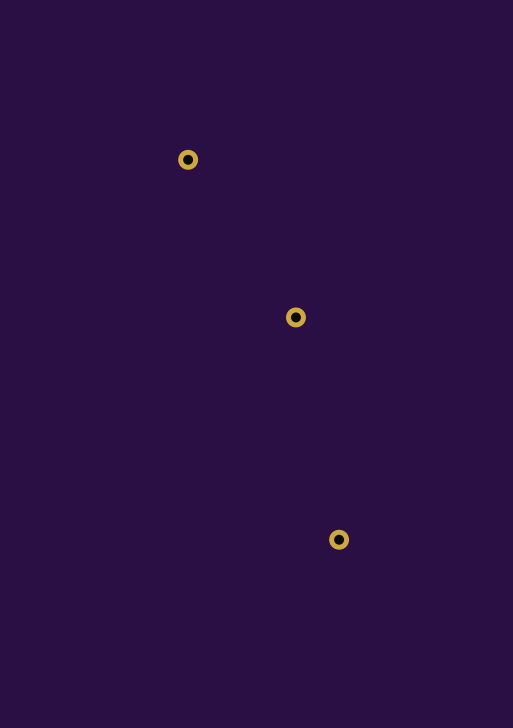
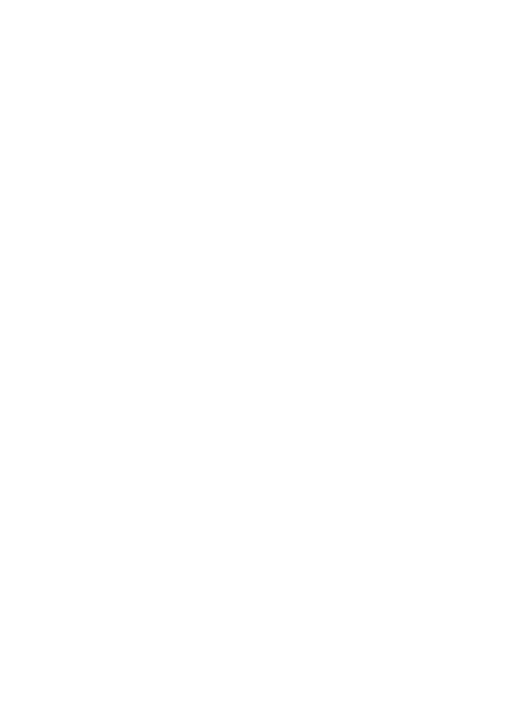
via: (188, 159) -> none
via: (295, 317) -> none
via: (339, 539) -> none

